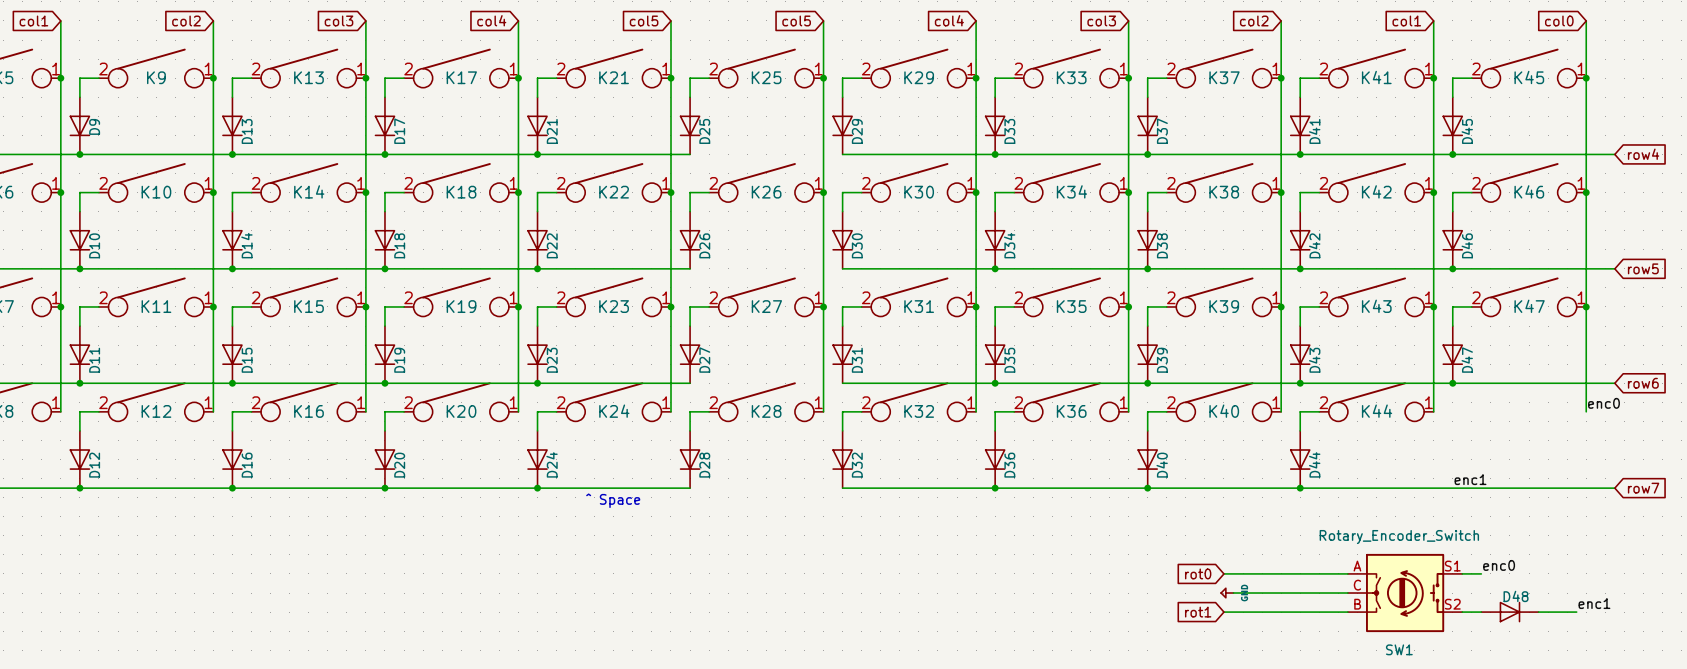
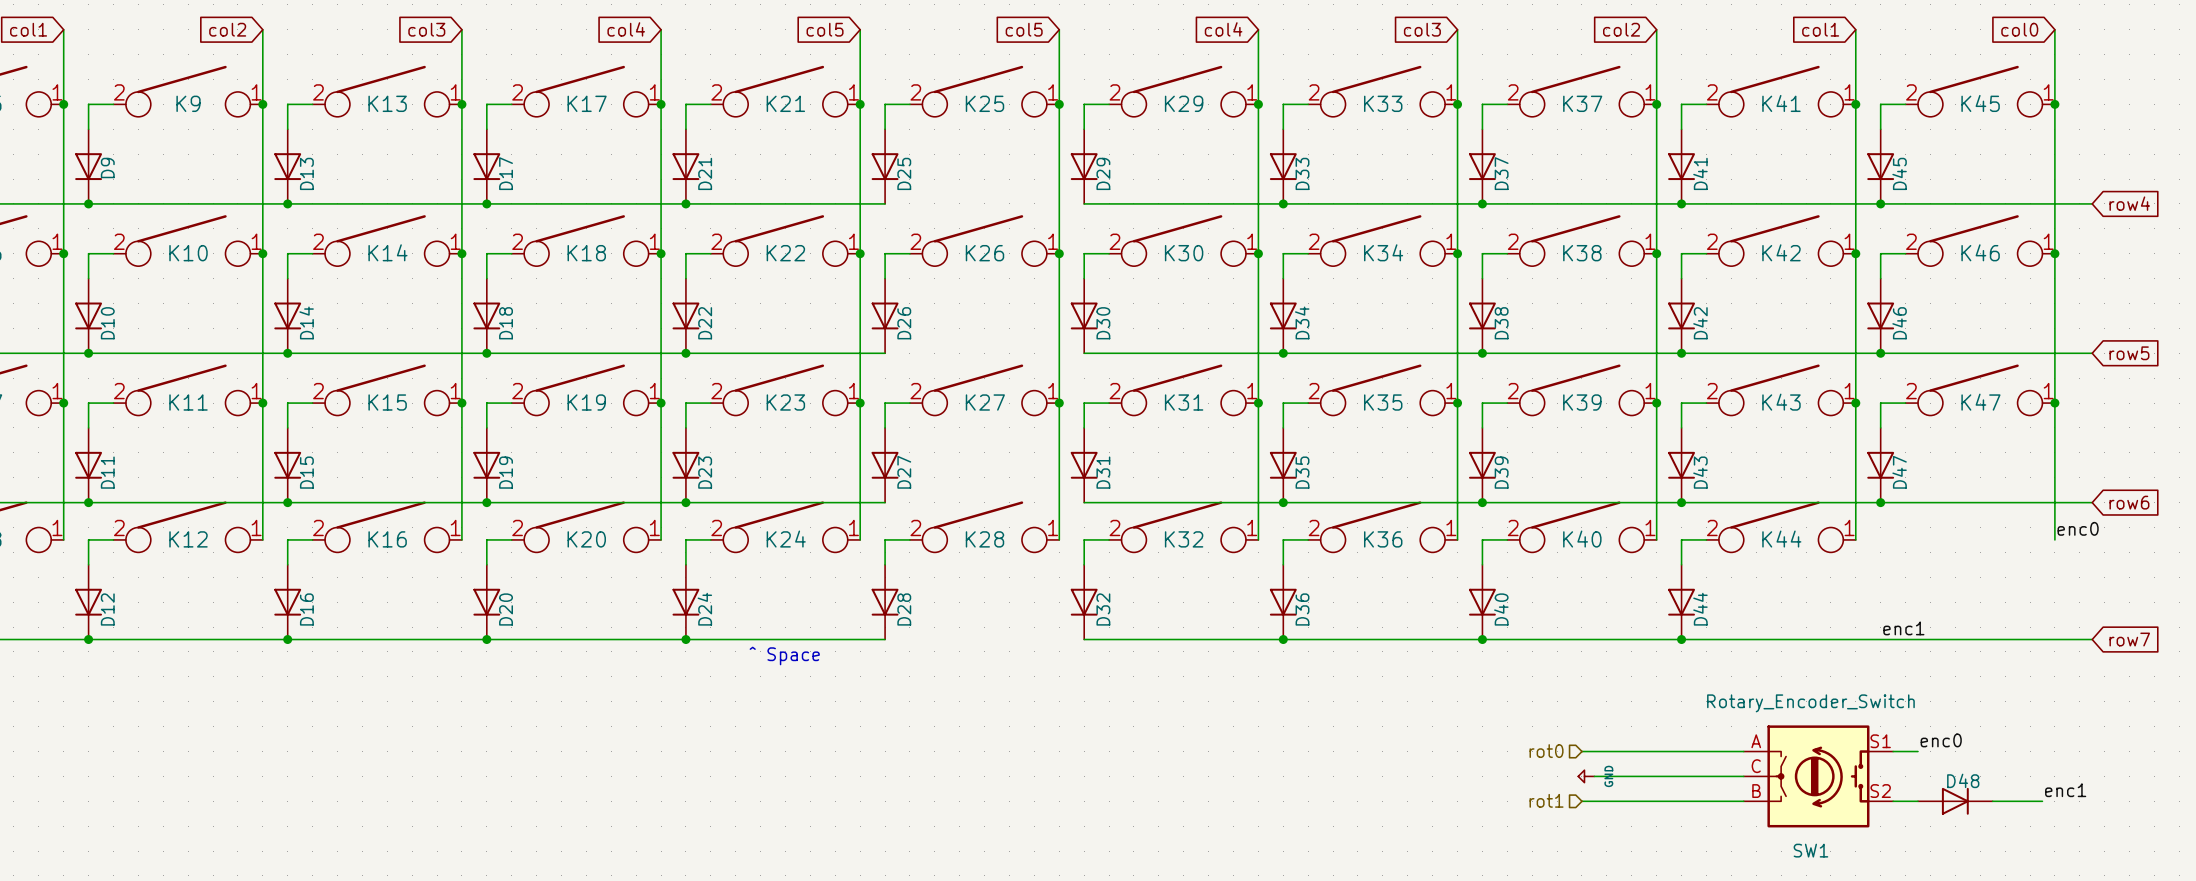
hierarchical label: none -> rot0 (1546, 751)
global label: rot0 (1198, 573) -> none
hierarchical label: none -> rot1 (1546, 800)
global label: rot1 (1198, 612) -> none

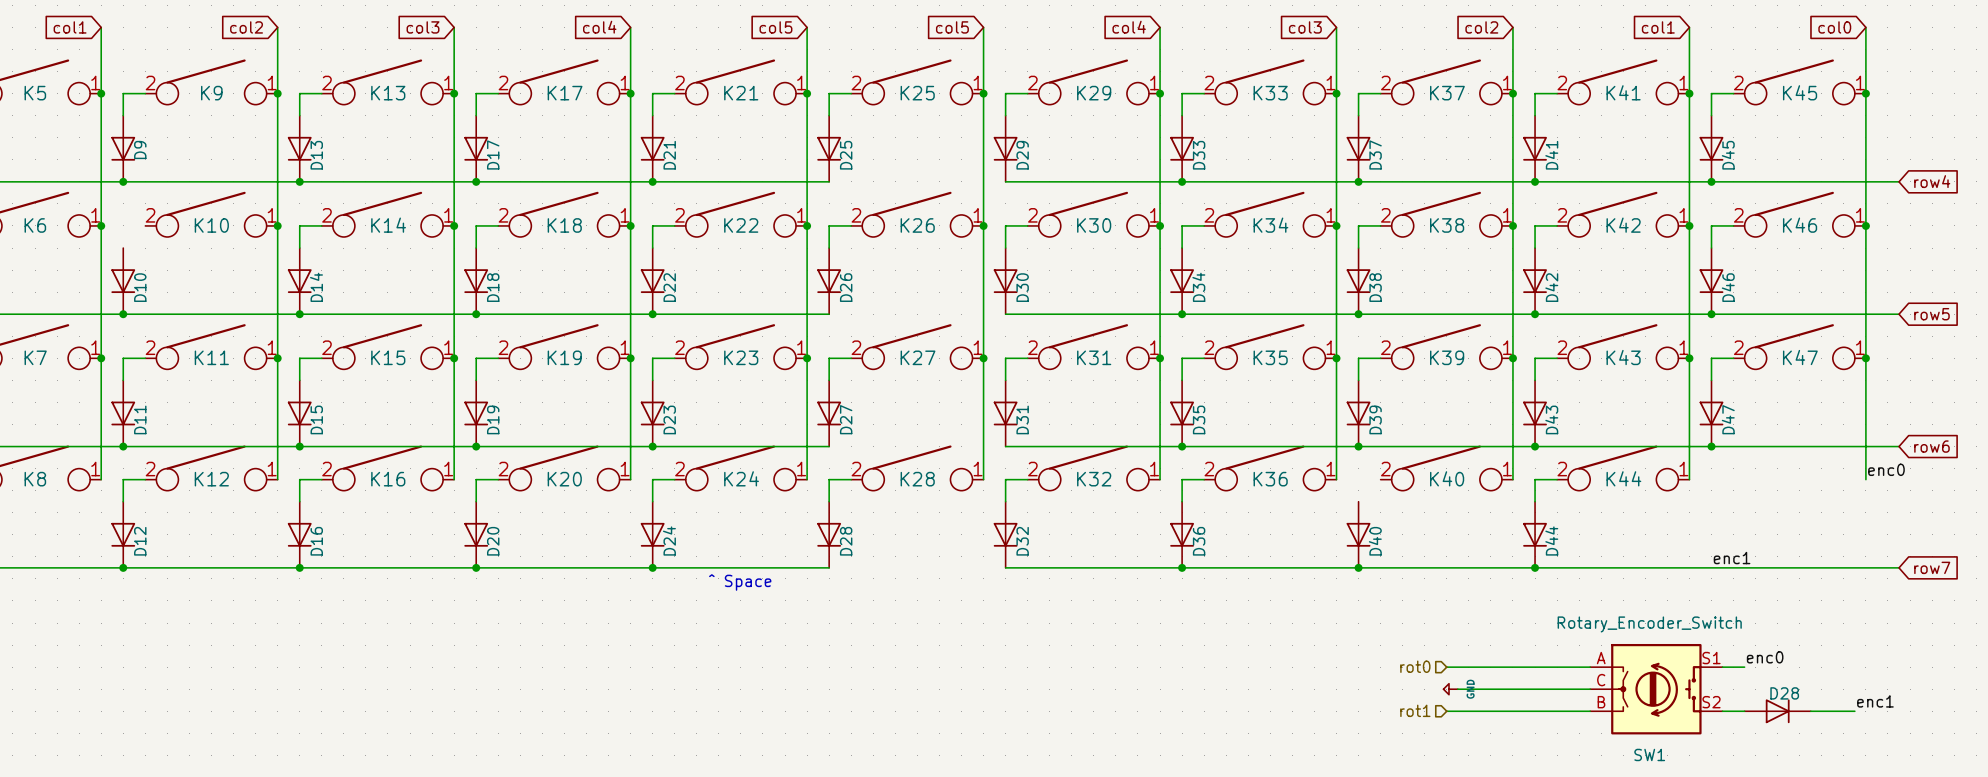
wire: (113, 253) (88, 253) (88, 278) -> none
wire: (1507, 539) (1482, 539) (1482, 564) -> none
D48 name: D48 (1963, 780) -> D28 (1784, 693)

